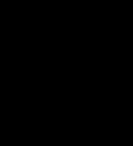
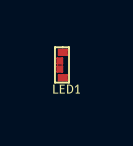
LED1: none -> (61, 64)

